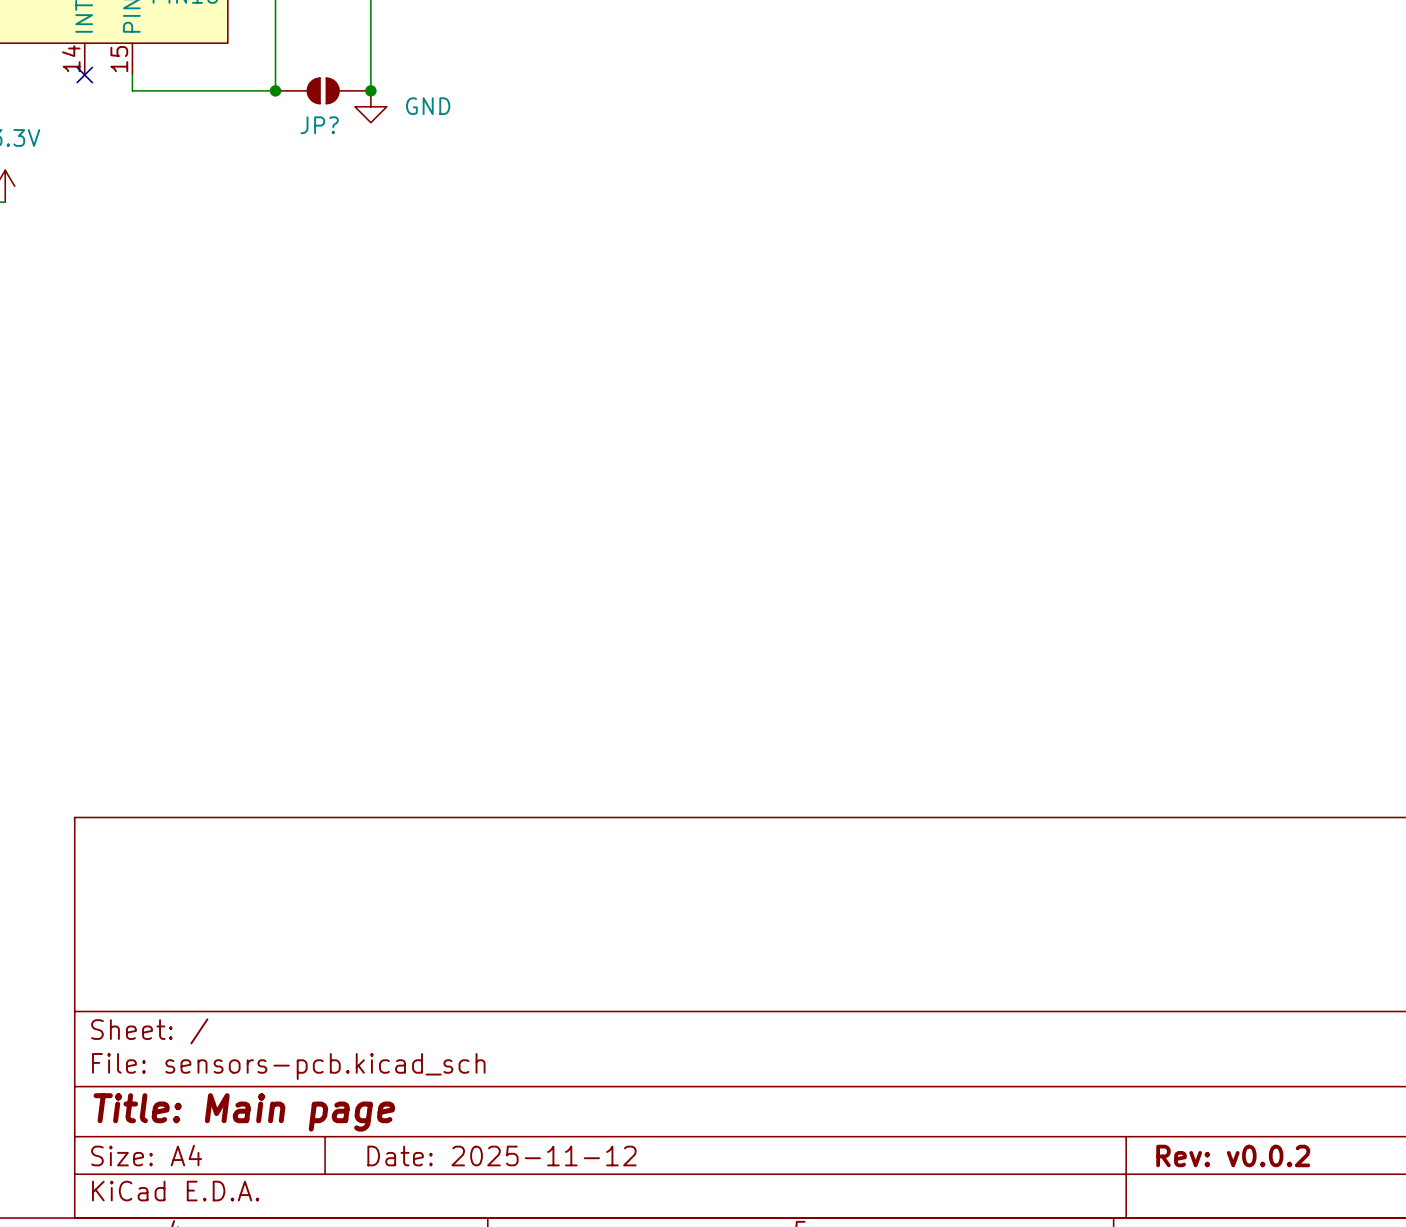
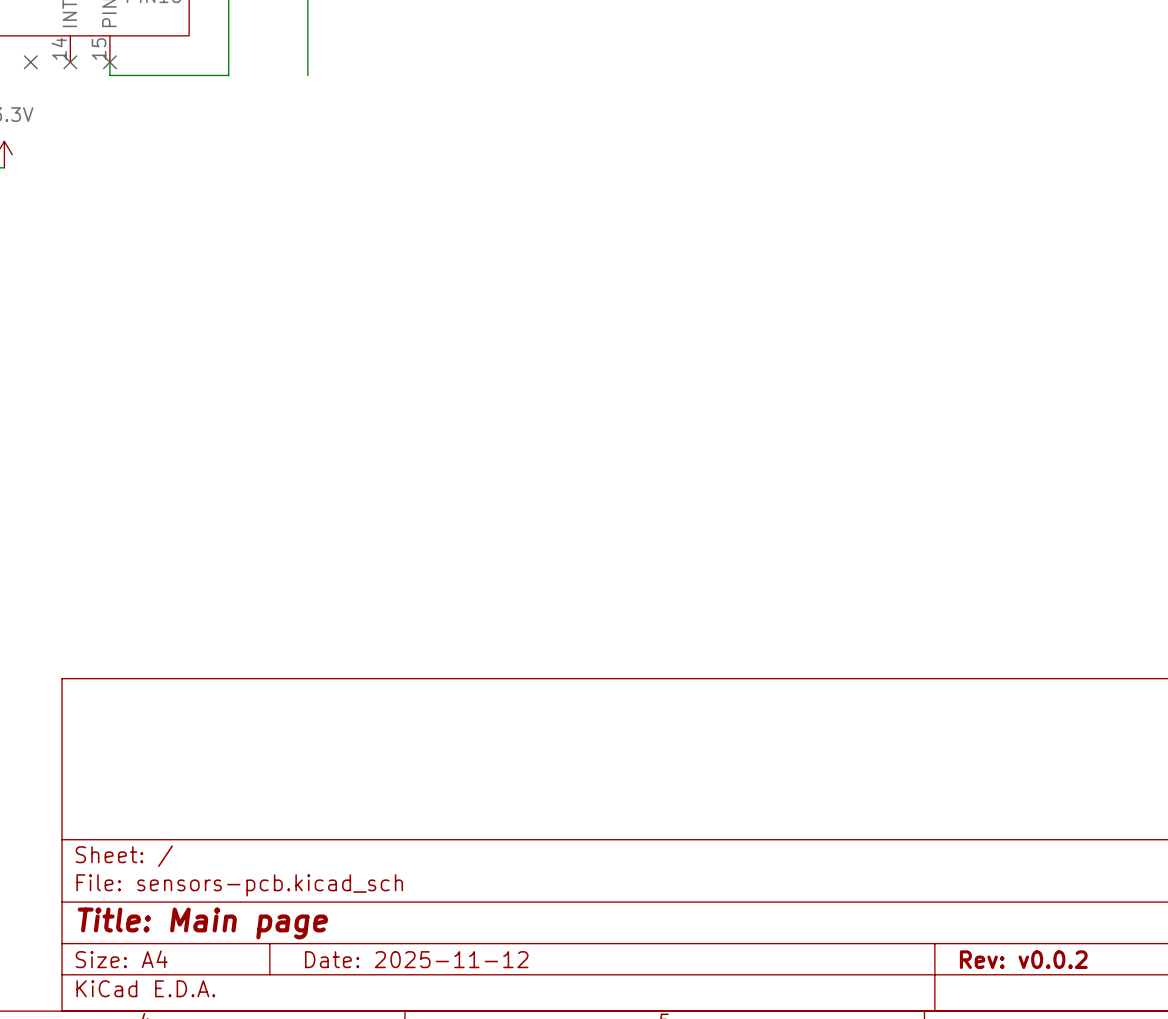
no-connect mark: none -> (30, 62)
no-connect mark: none -> (109, 62)
junction: (275, 90) -> none
JP?: (323, 90) -> none
junction: (370, 90) -> none
power symbol: GND (370, 106) -> none

